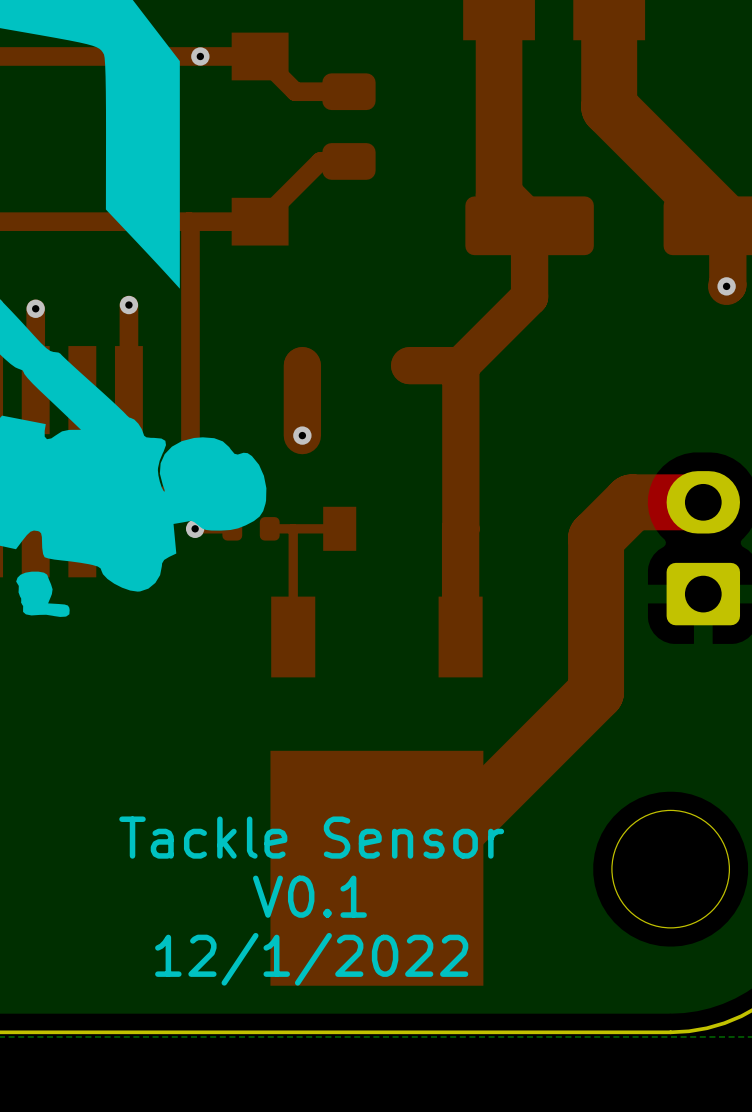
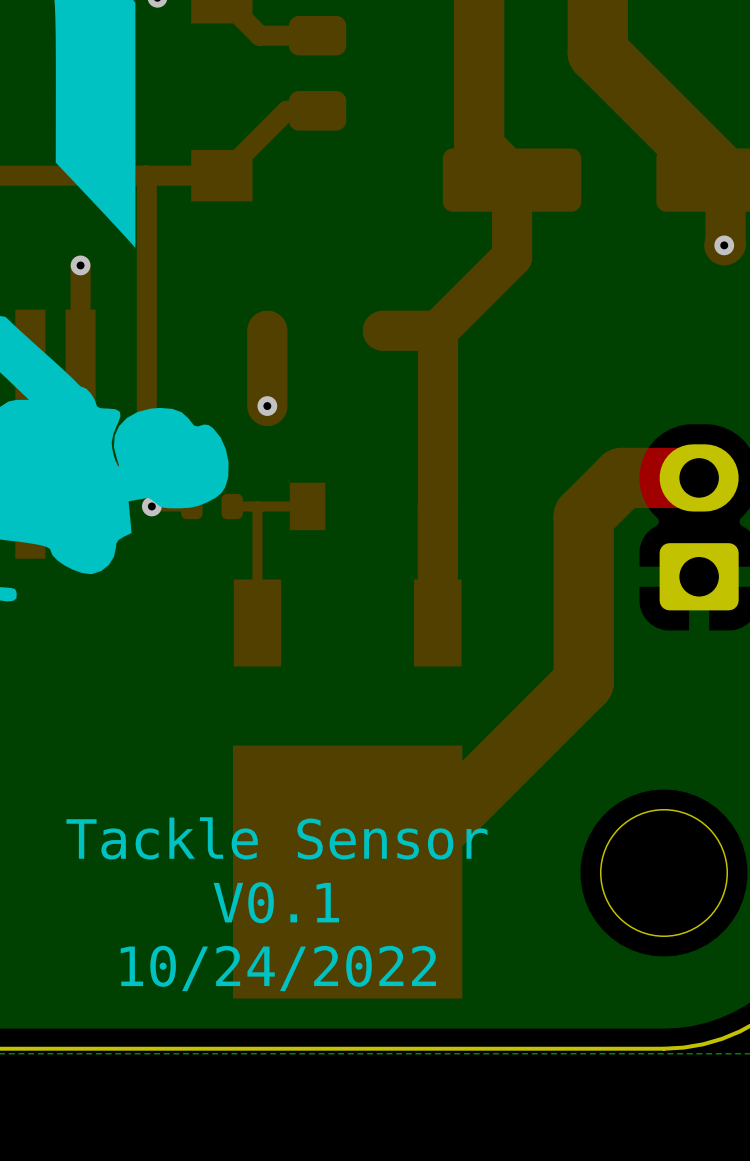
text: 12/1/2022 (311, 959) -> 10/24/2022 (278, 968)

